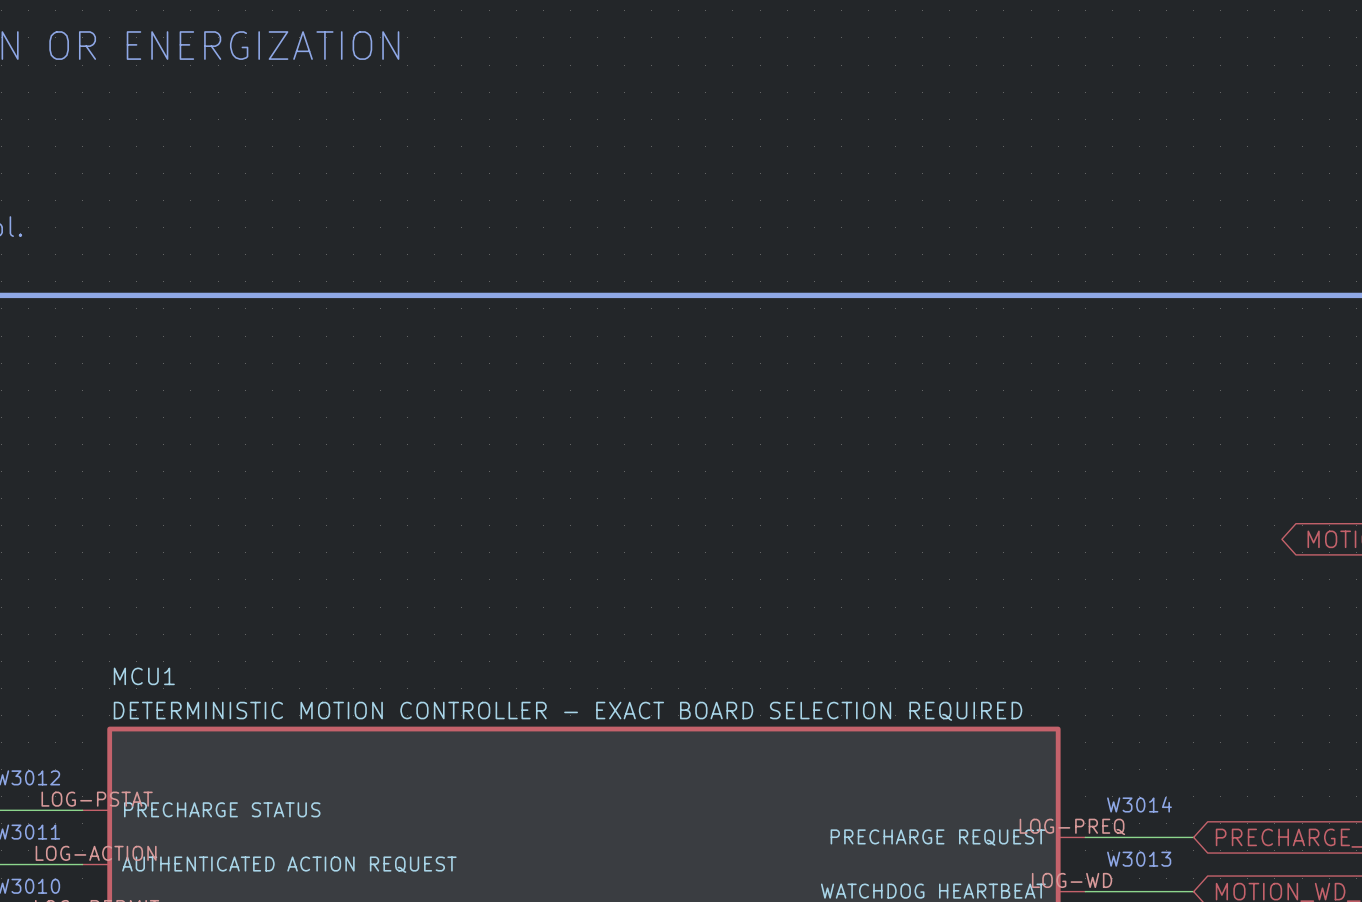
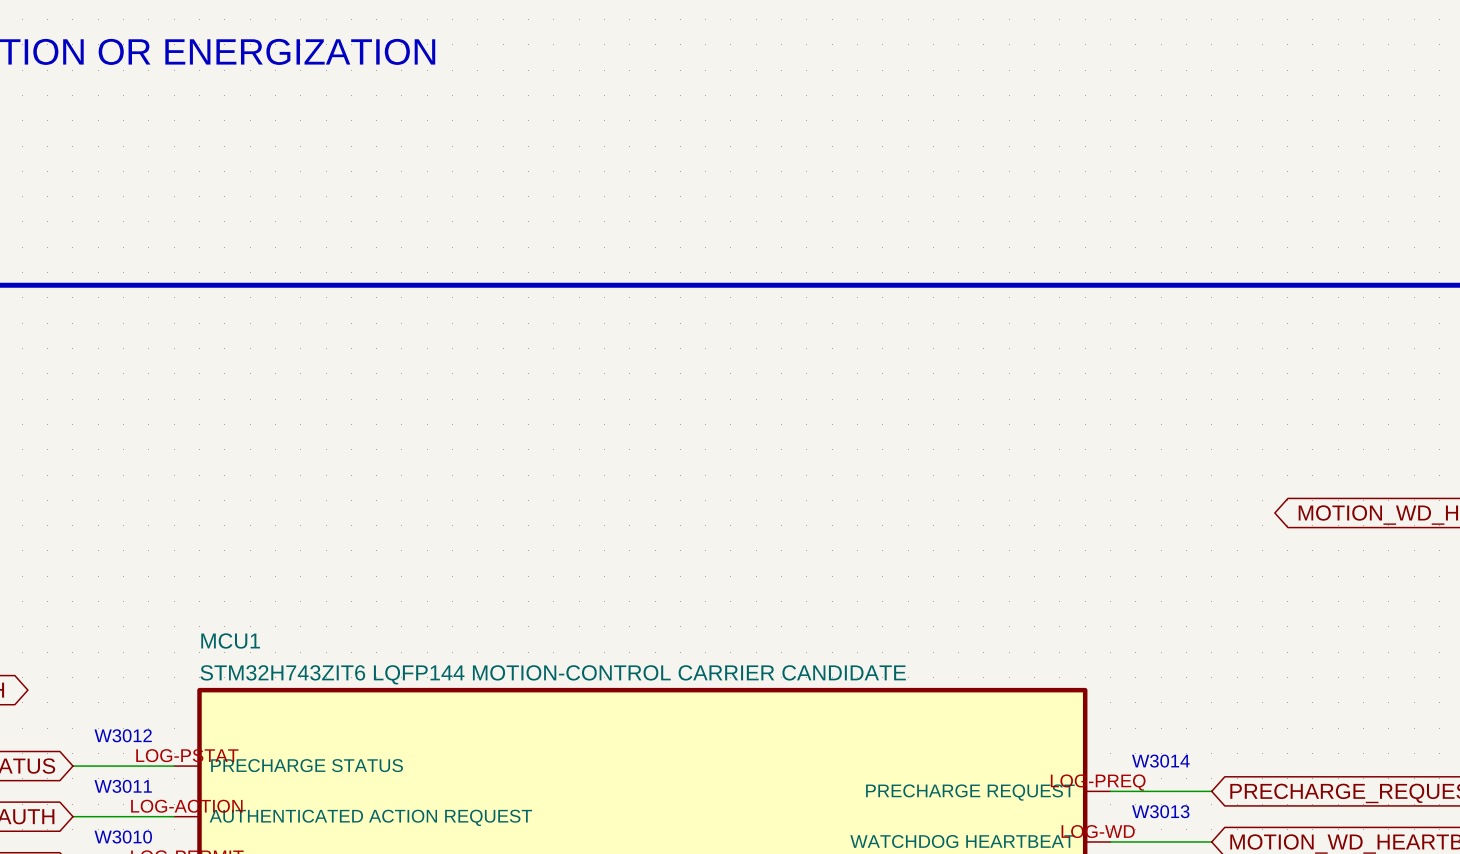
MCU1 text: DETERMINISTIC MOTION CONTROLLER - EXACT BOARD SELECTION REQUIRED (568, 711) -> STM32H743ZIT6 LQFP144 MOTION-CONTROL CARRIER CANDIDATE (553, 674)

